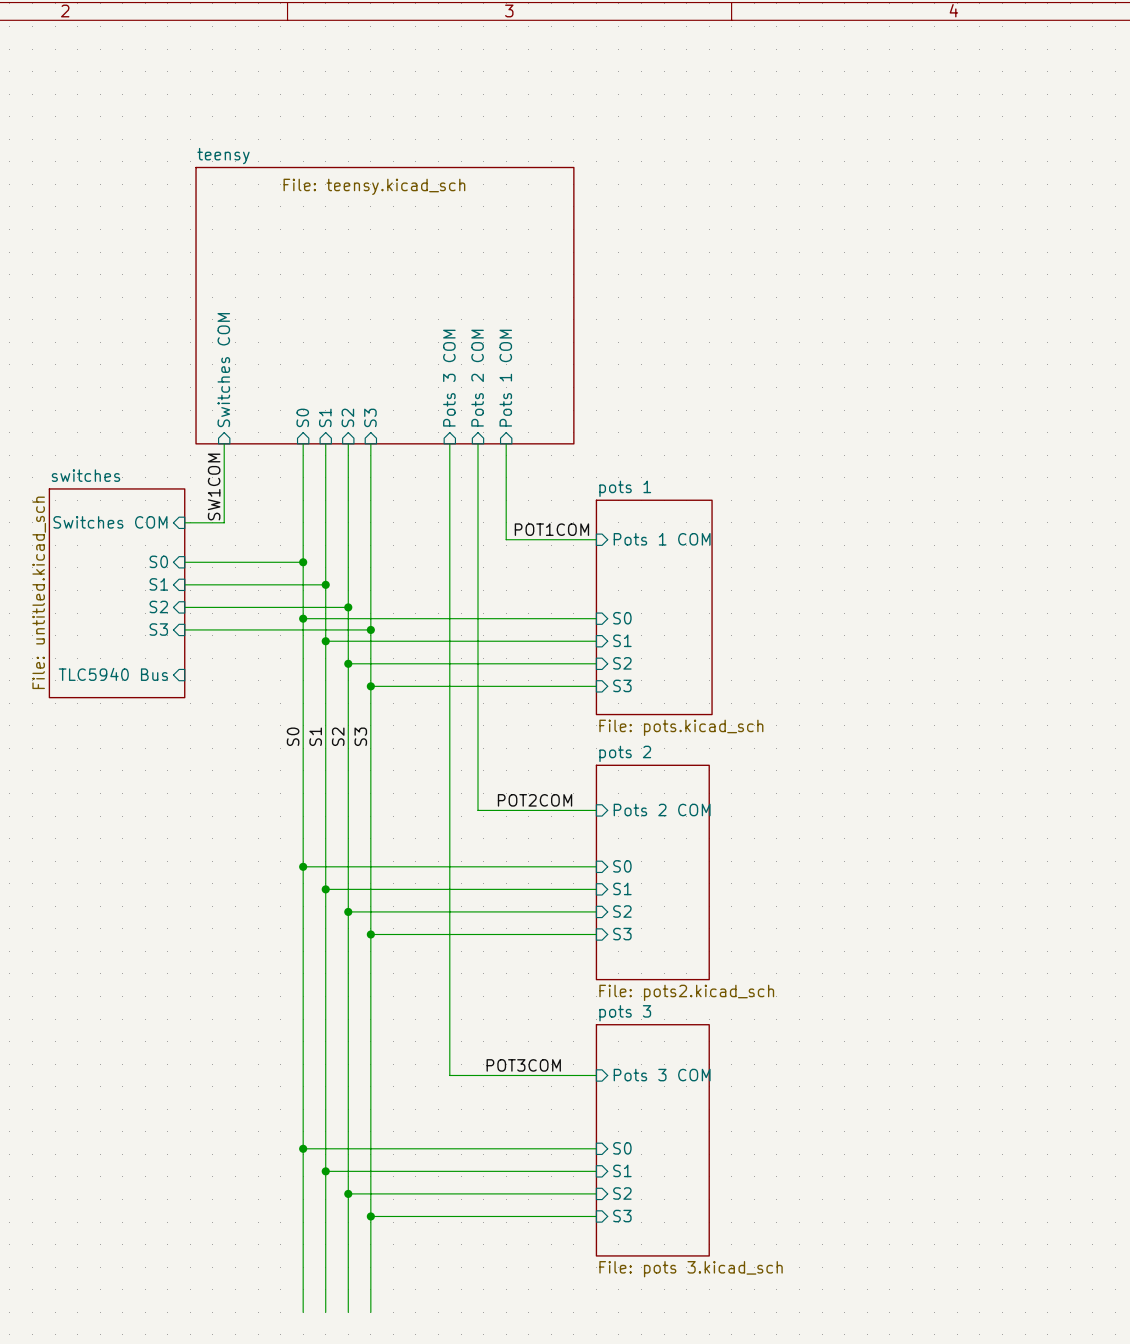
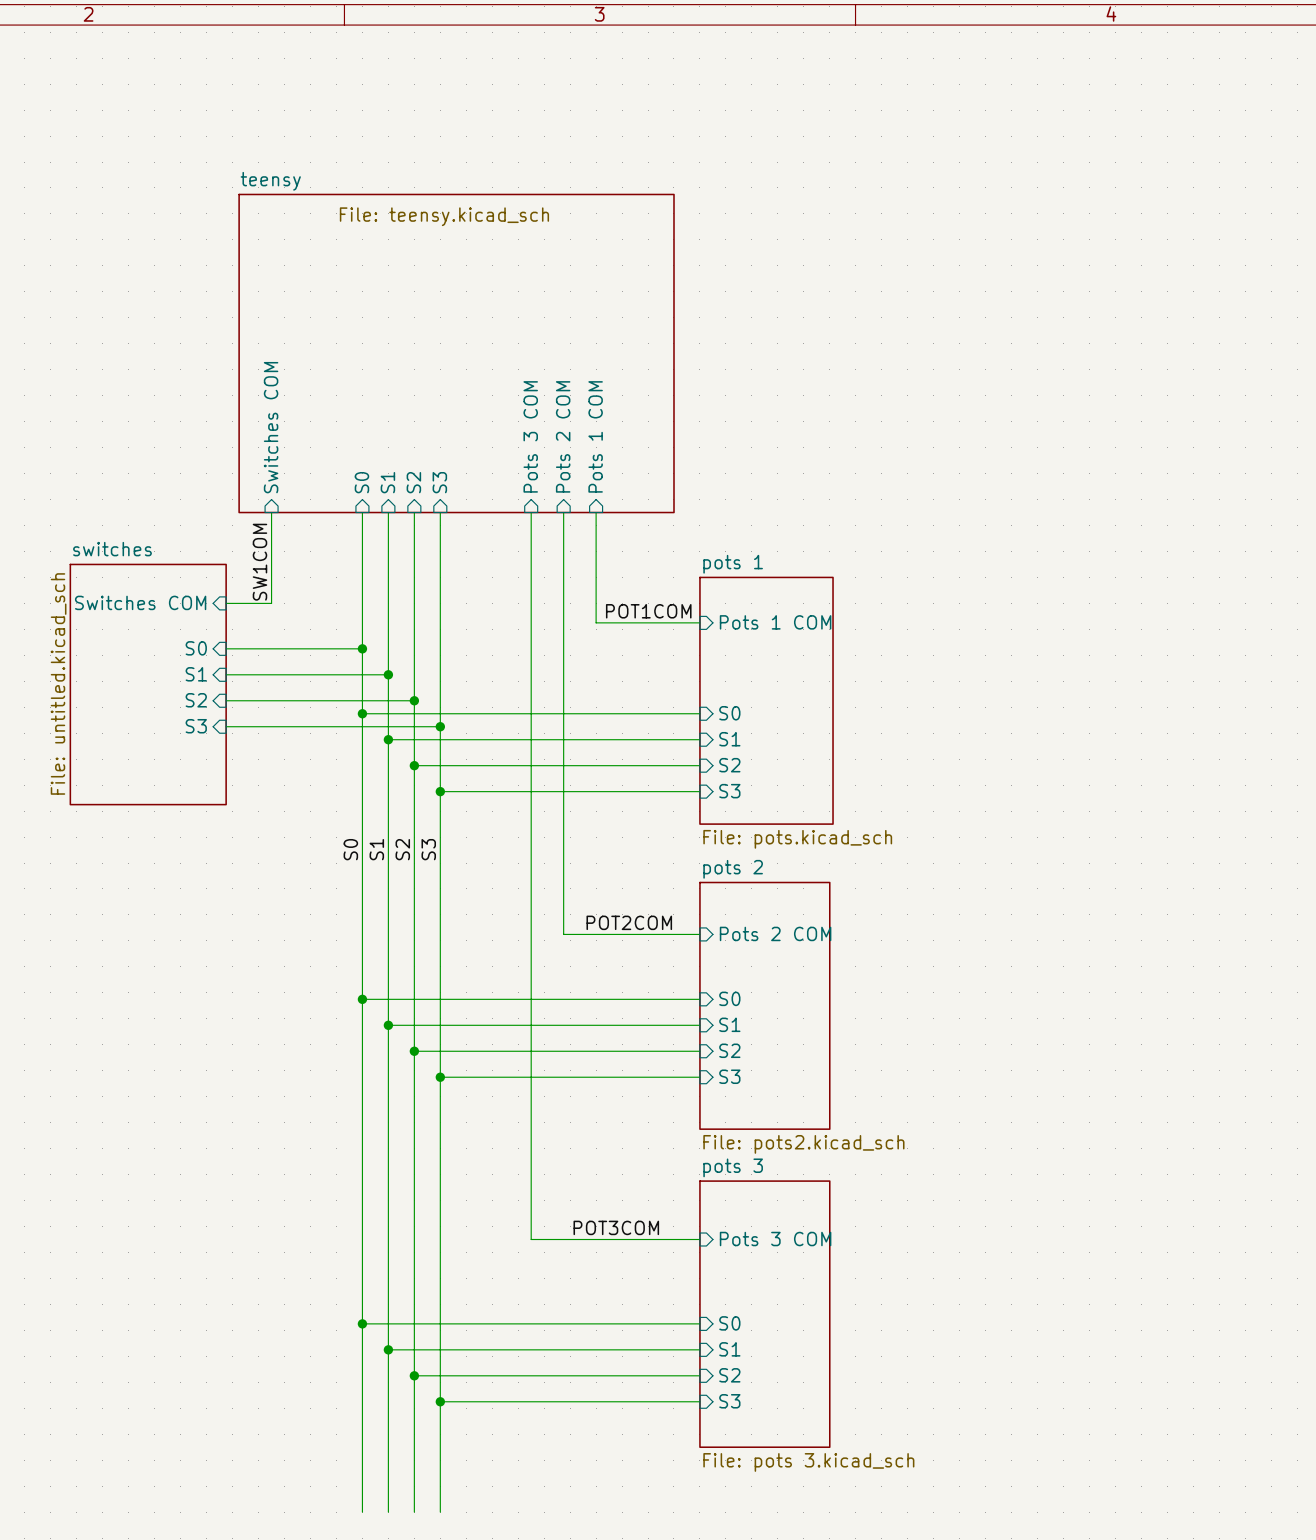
sheet pin: TLC5940 Bus (113, 674) -> none

